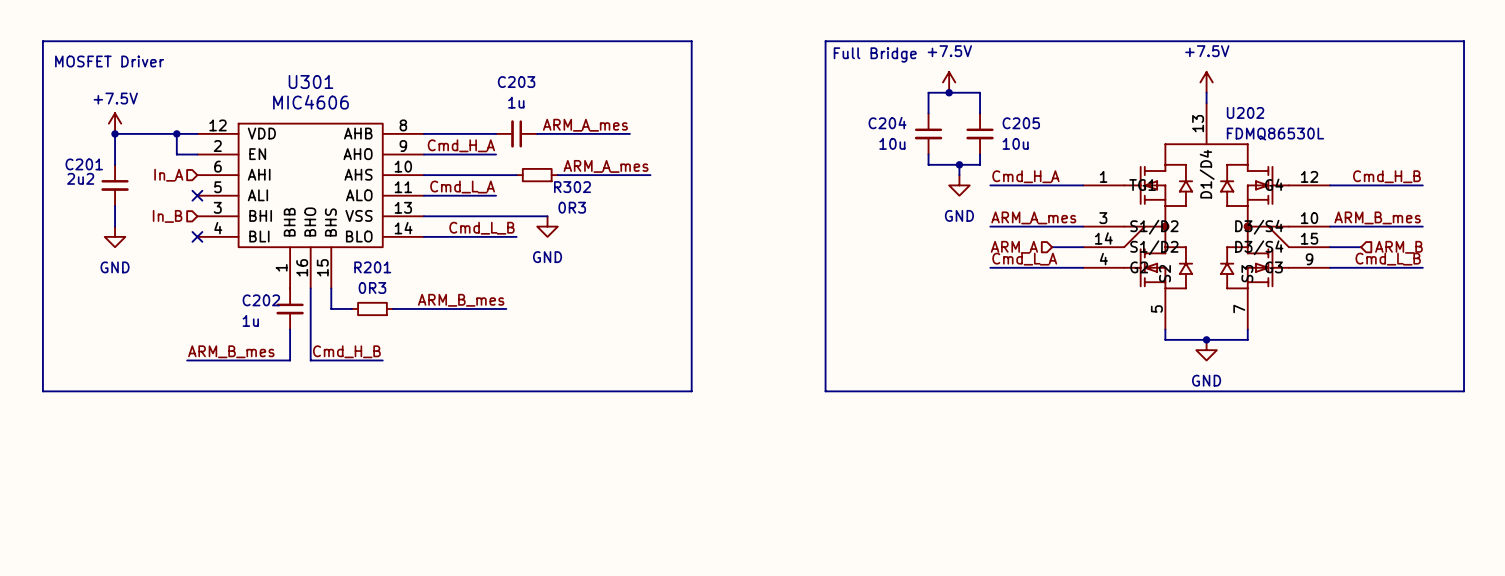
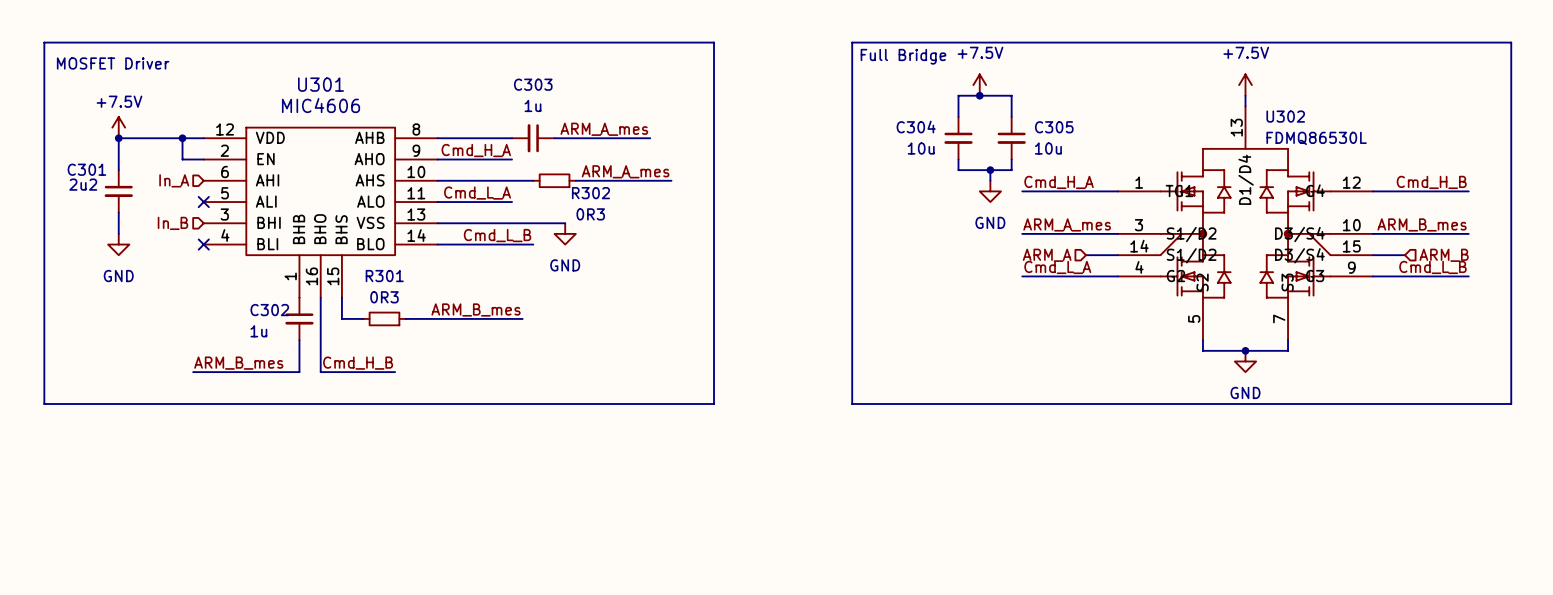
C203 name: C203 (516, 82) -> C303 (533, 84)
U202 name: U202 (1245, 112) -> U302 (1285, 116)
C204 name: C204 (887, 123) -> C304 (916, 127)
C205 name: C205 (1021, 123) -> C305 (1054, 127)
C201 name: C201 (84, 164) -> C301 (86, 169)
R201 name: R201 (372, 267) -> R301 (384, 276)
C202 name: C202 (261, 300) -> C302 (269, 310)

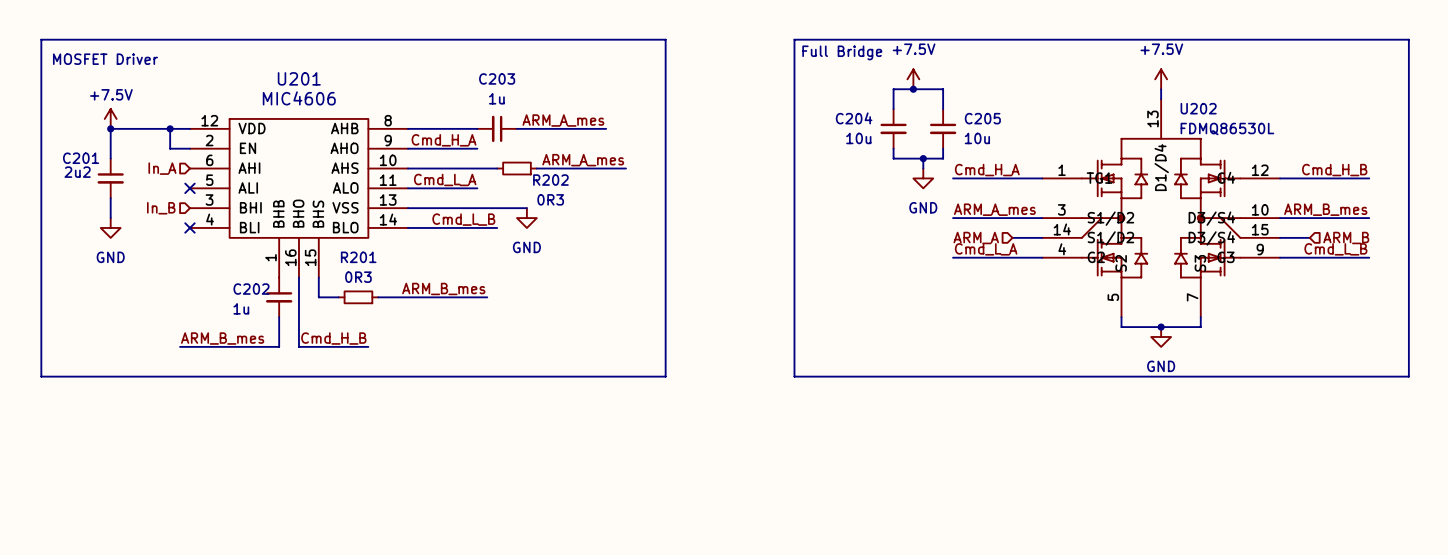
U301 name: U301 (321, 84) -> U201 (299, 78)
C303 name: C303 (533, 84) -> C203 (497, 78)
U302 name: U302 (1285, 116) -> U202 (1198, 108)
C304 name: C304 (916, 127) -> C204 (854, 118)
C305 name: C305 (1054, 127) -> C205 (982, 118)
C301 name: C301 (86, 169) -> C201 (81, 158)
R302 name: R302 (590, 193) -> R202 (550, 180)
R301 name: R301 (384, 276) -> R201 (358, 257)
C302 name: C302 (269, 310) -> C202 (251, 289)

